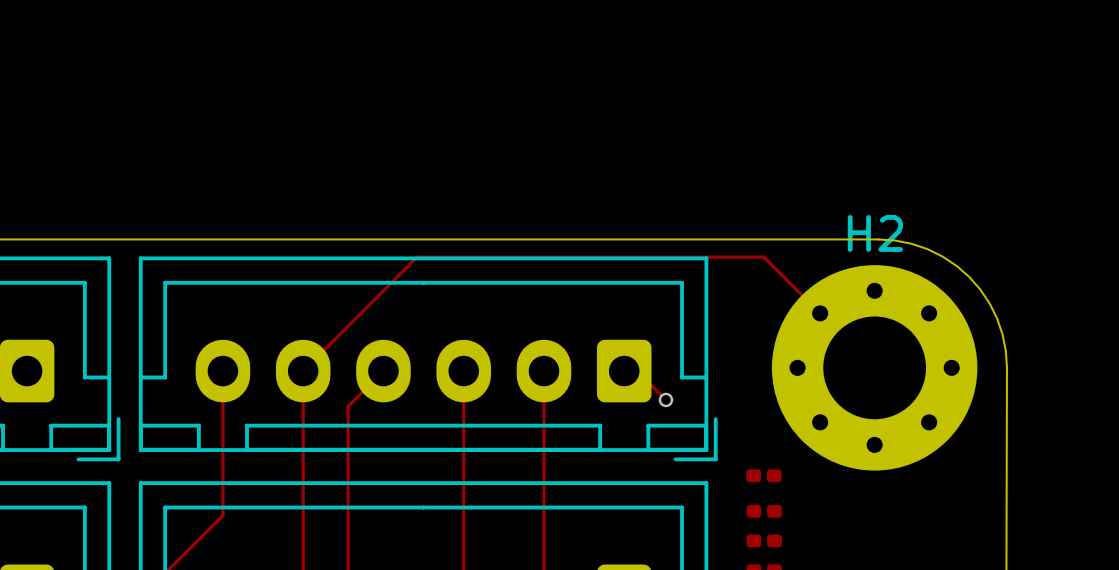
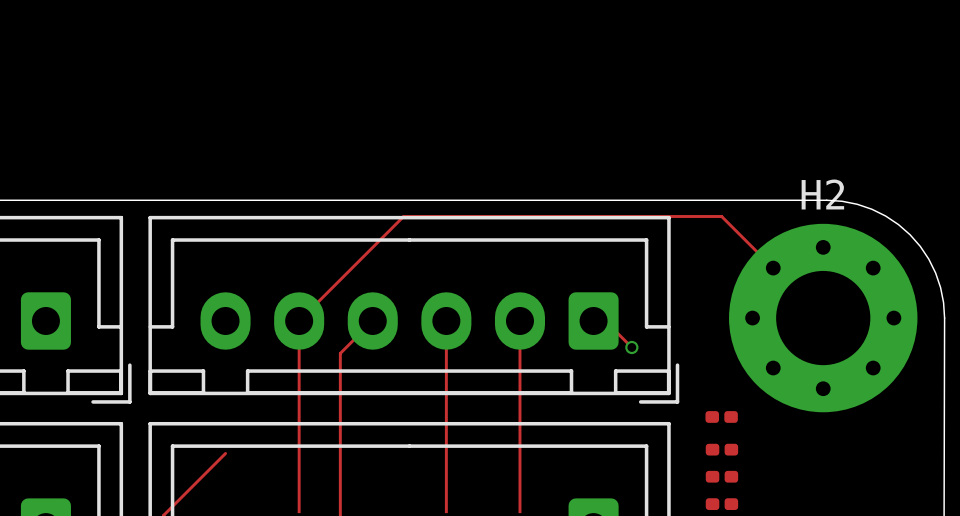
top track: (222, 371) (222, 515) -> none

